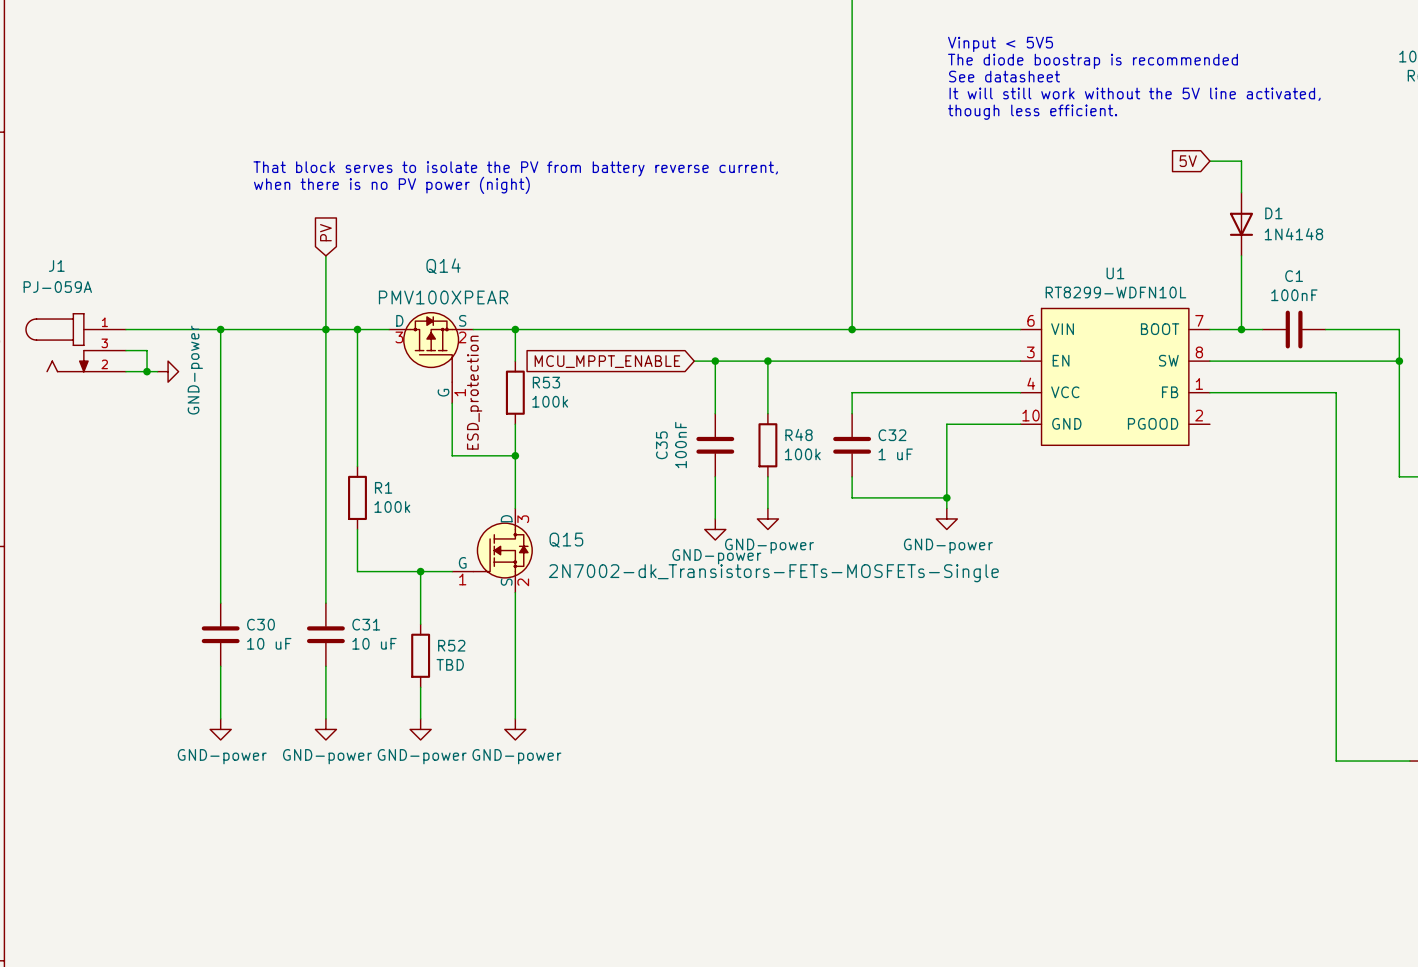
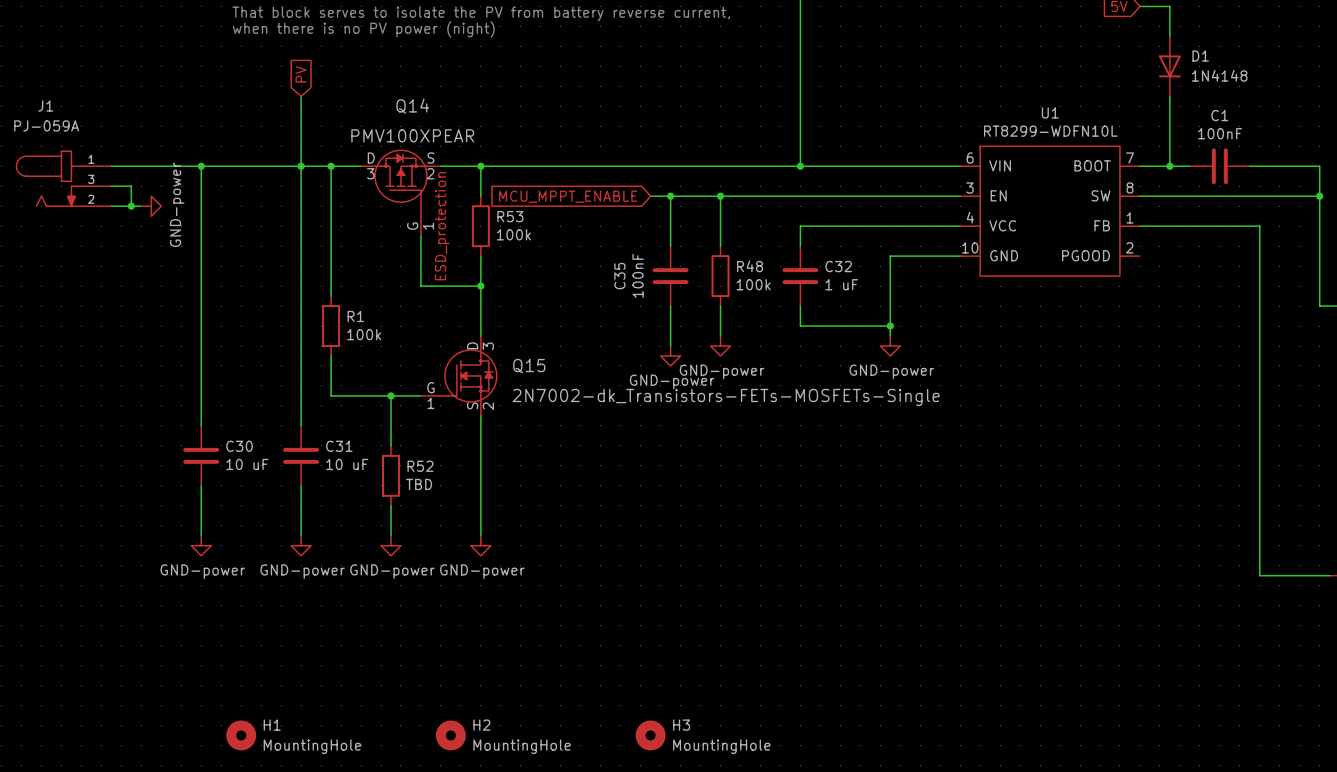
H1: none -> MountingHole (241, 735)
H2: none -> MountingHole (450, 735)
H3: none -> MountingHole (650, 735)

